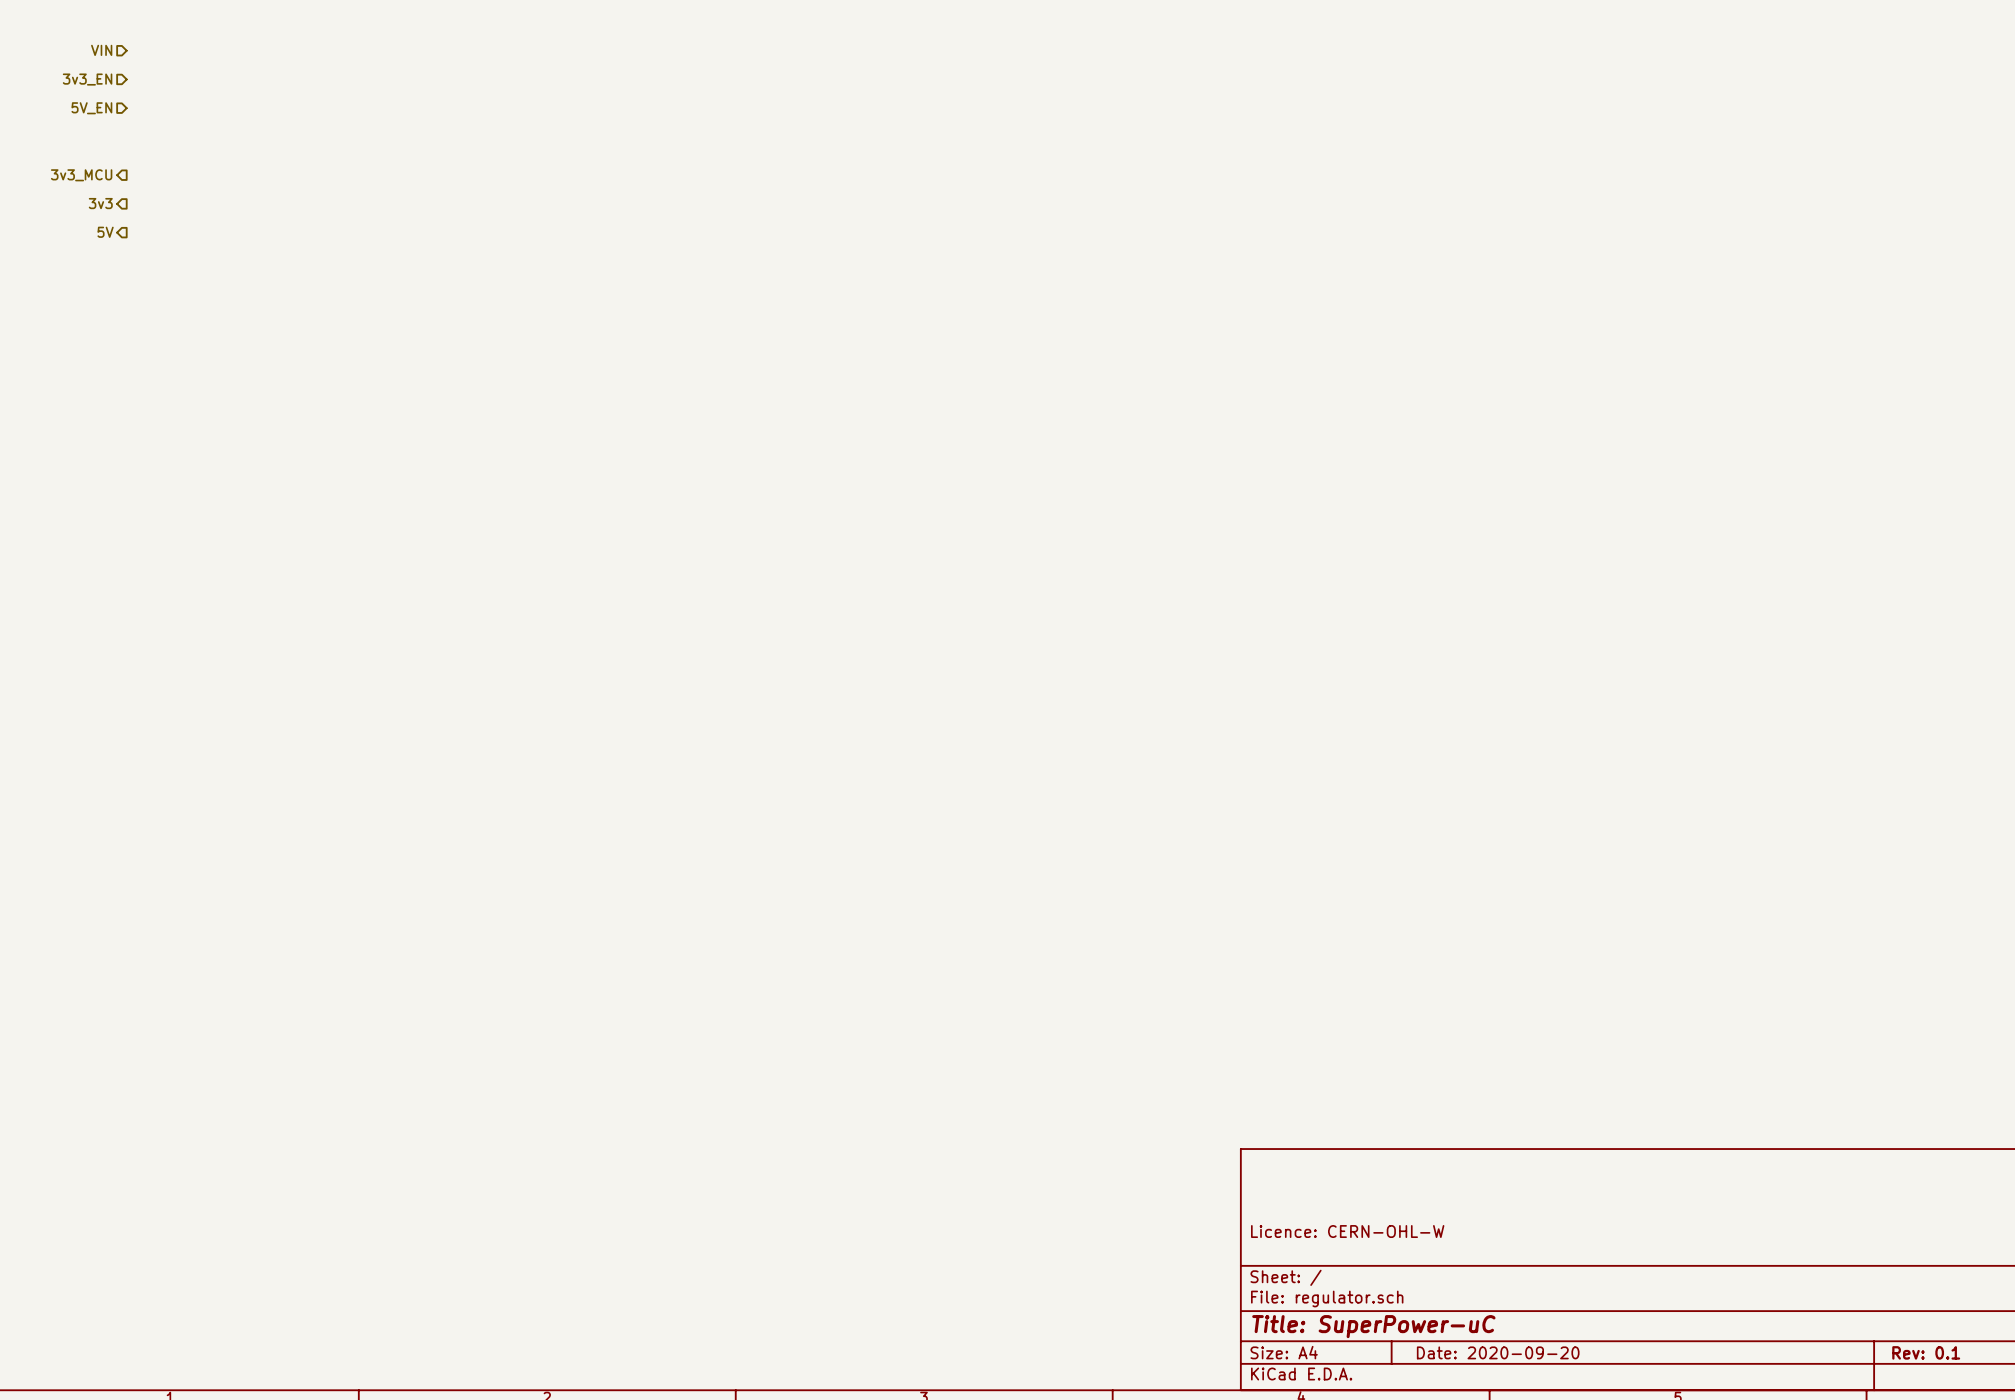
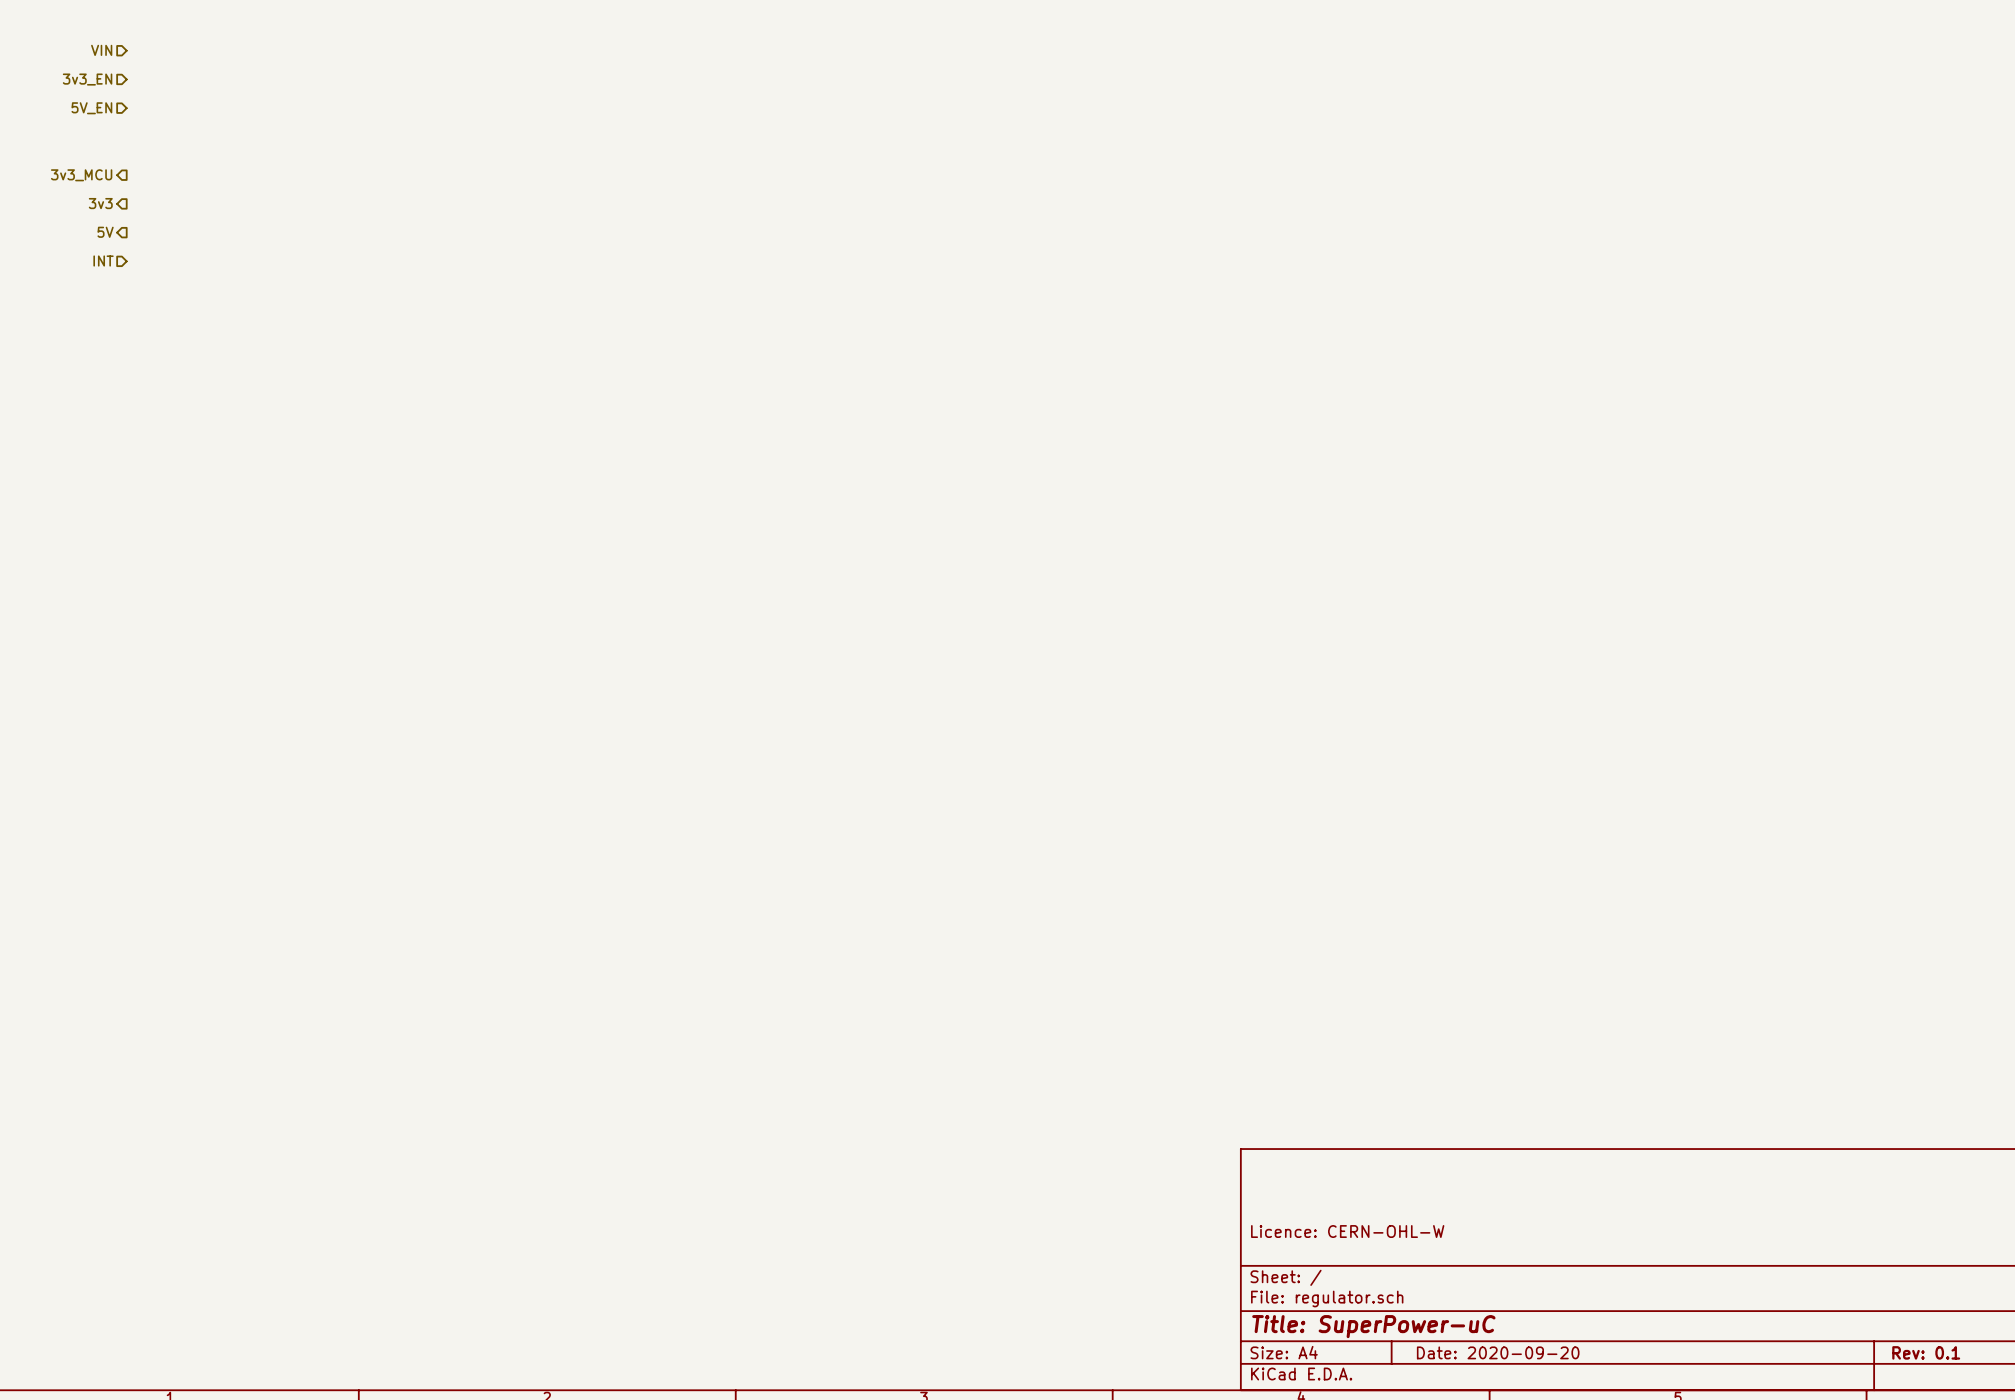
hierarchical label: none -> INT (103, 261)

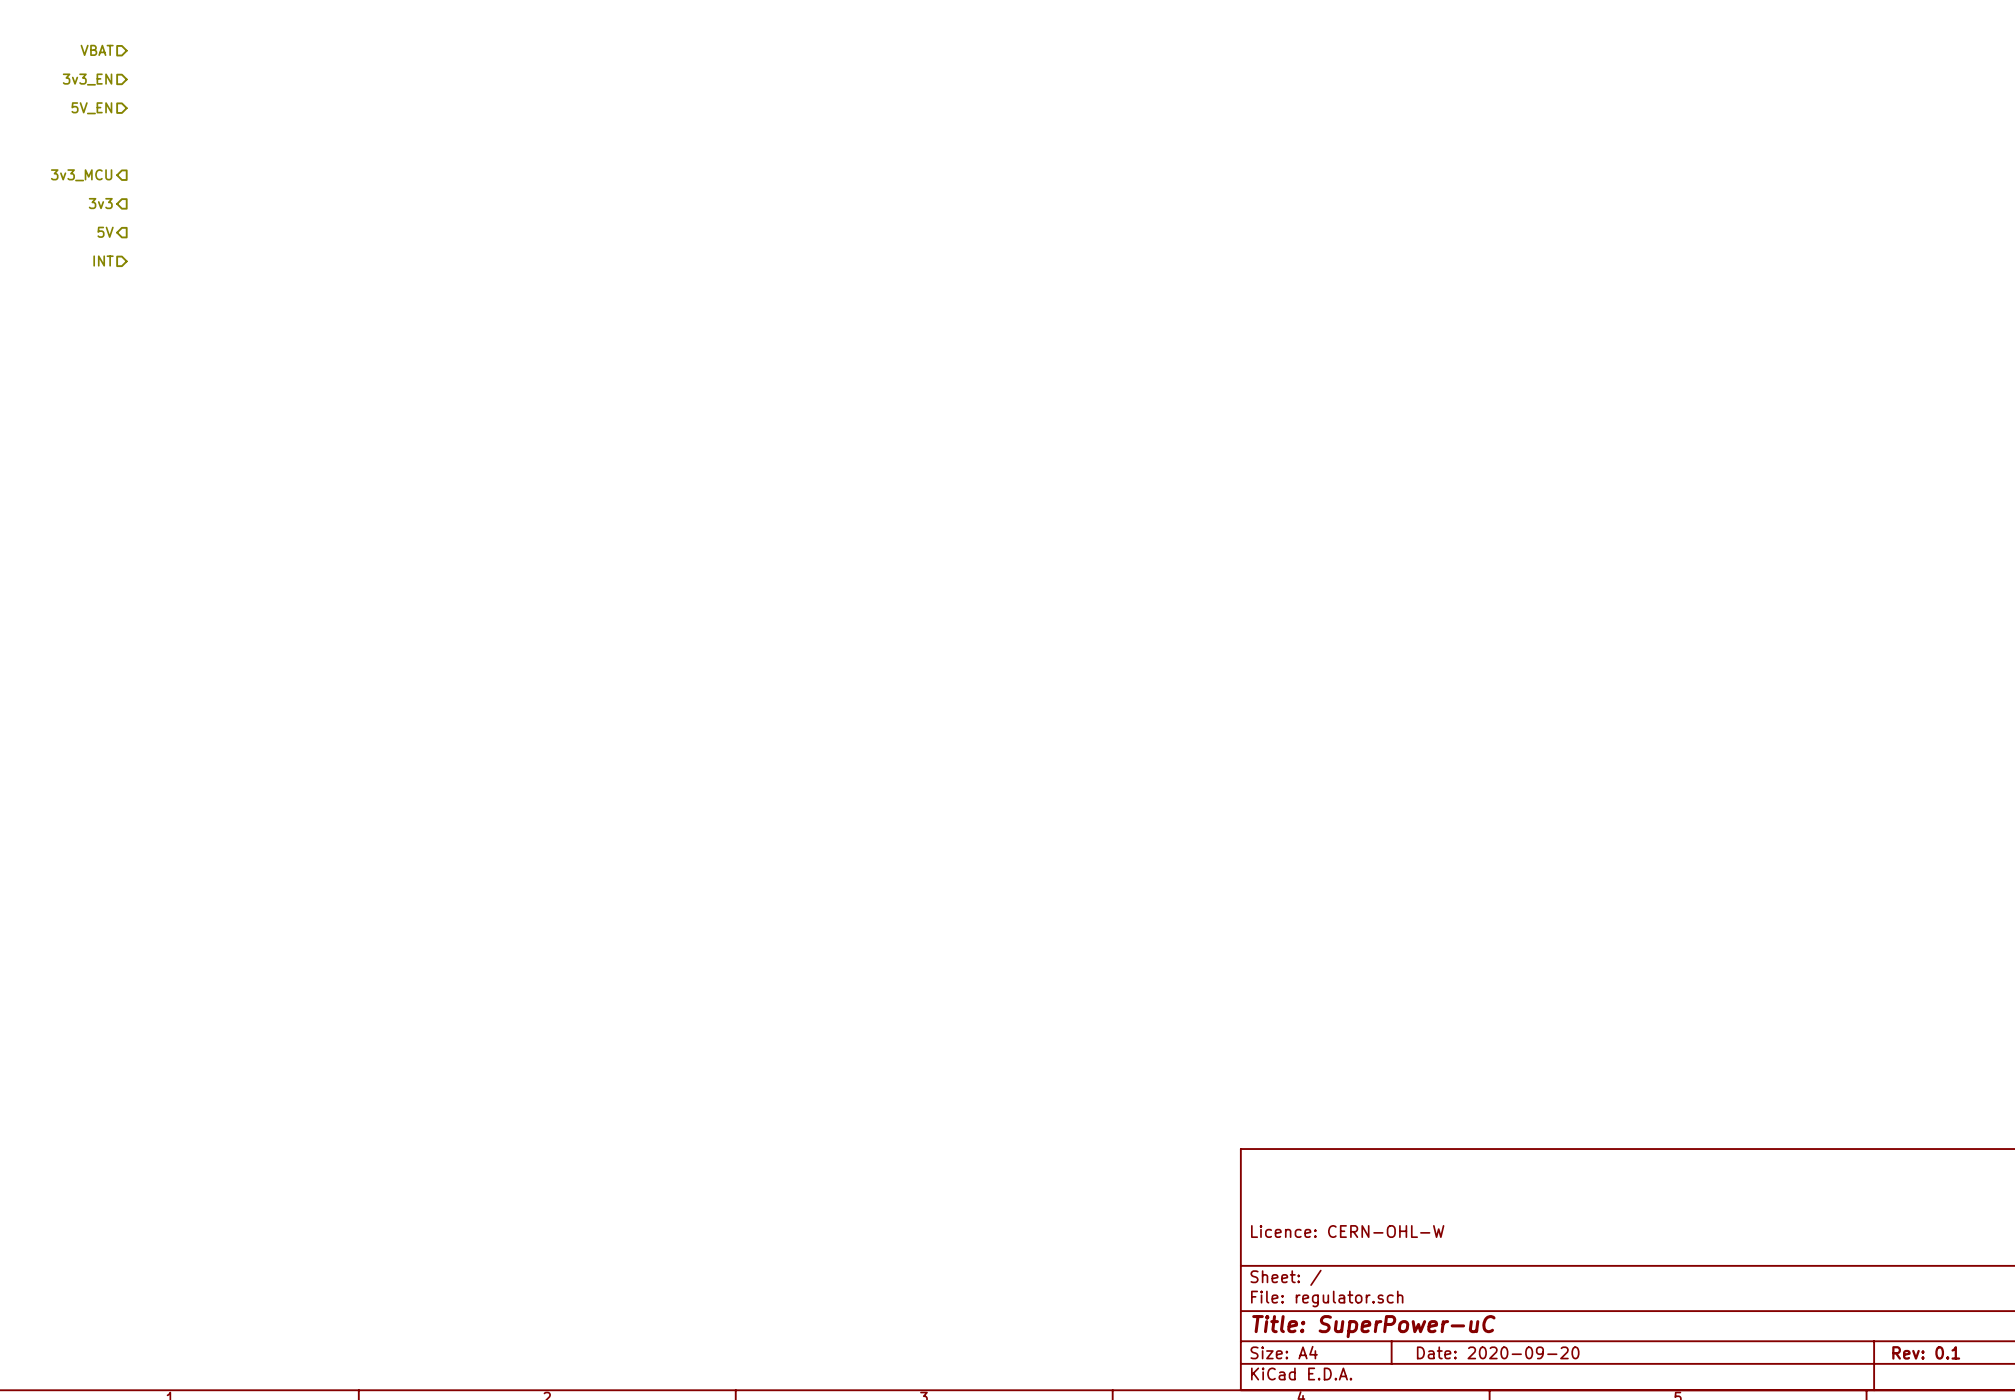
hierarchical label: VIN (101, 50) -> VBAT (97, 50)

